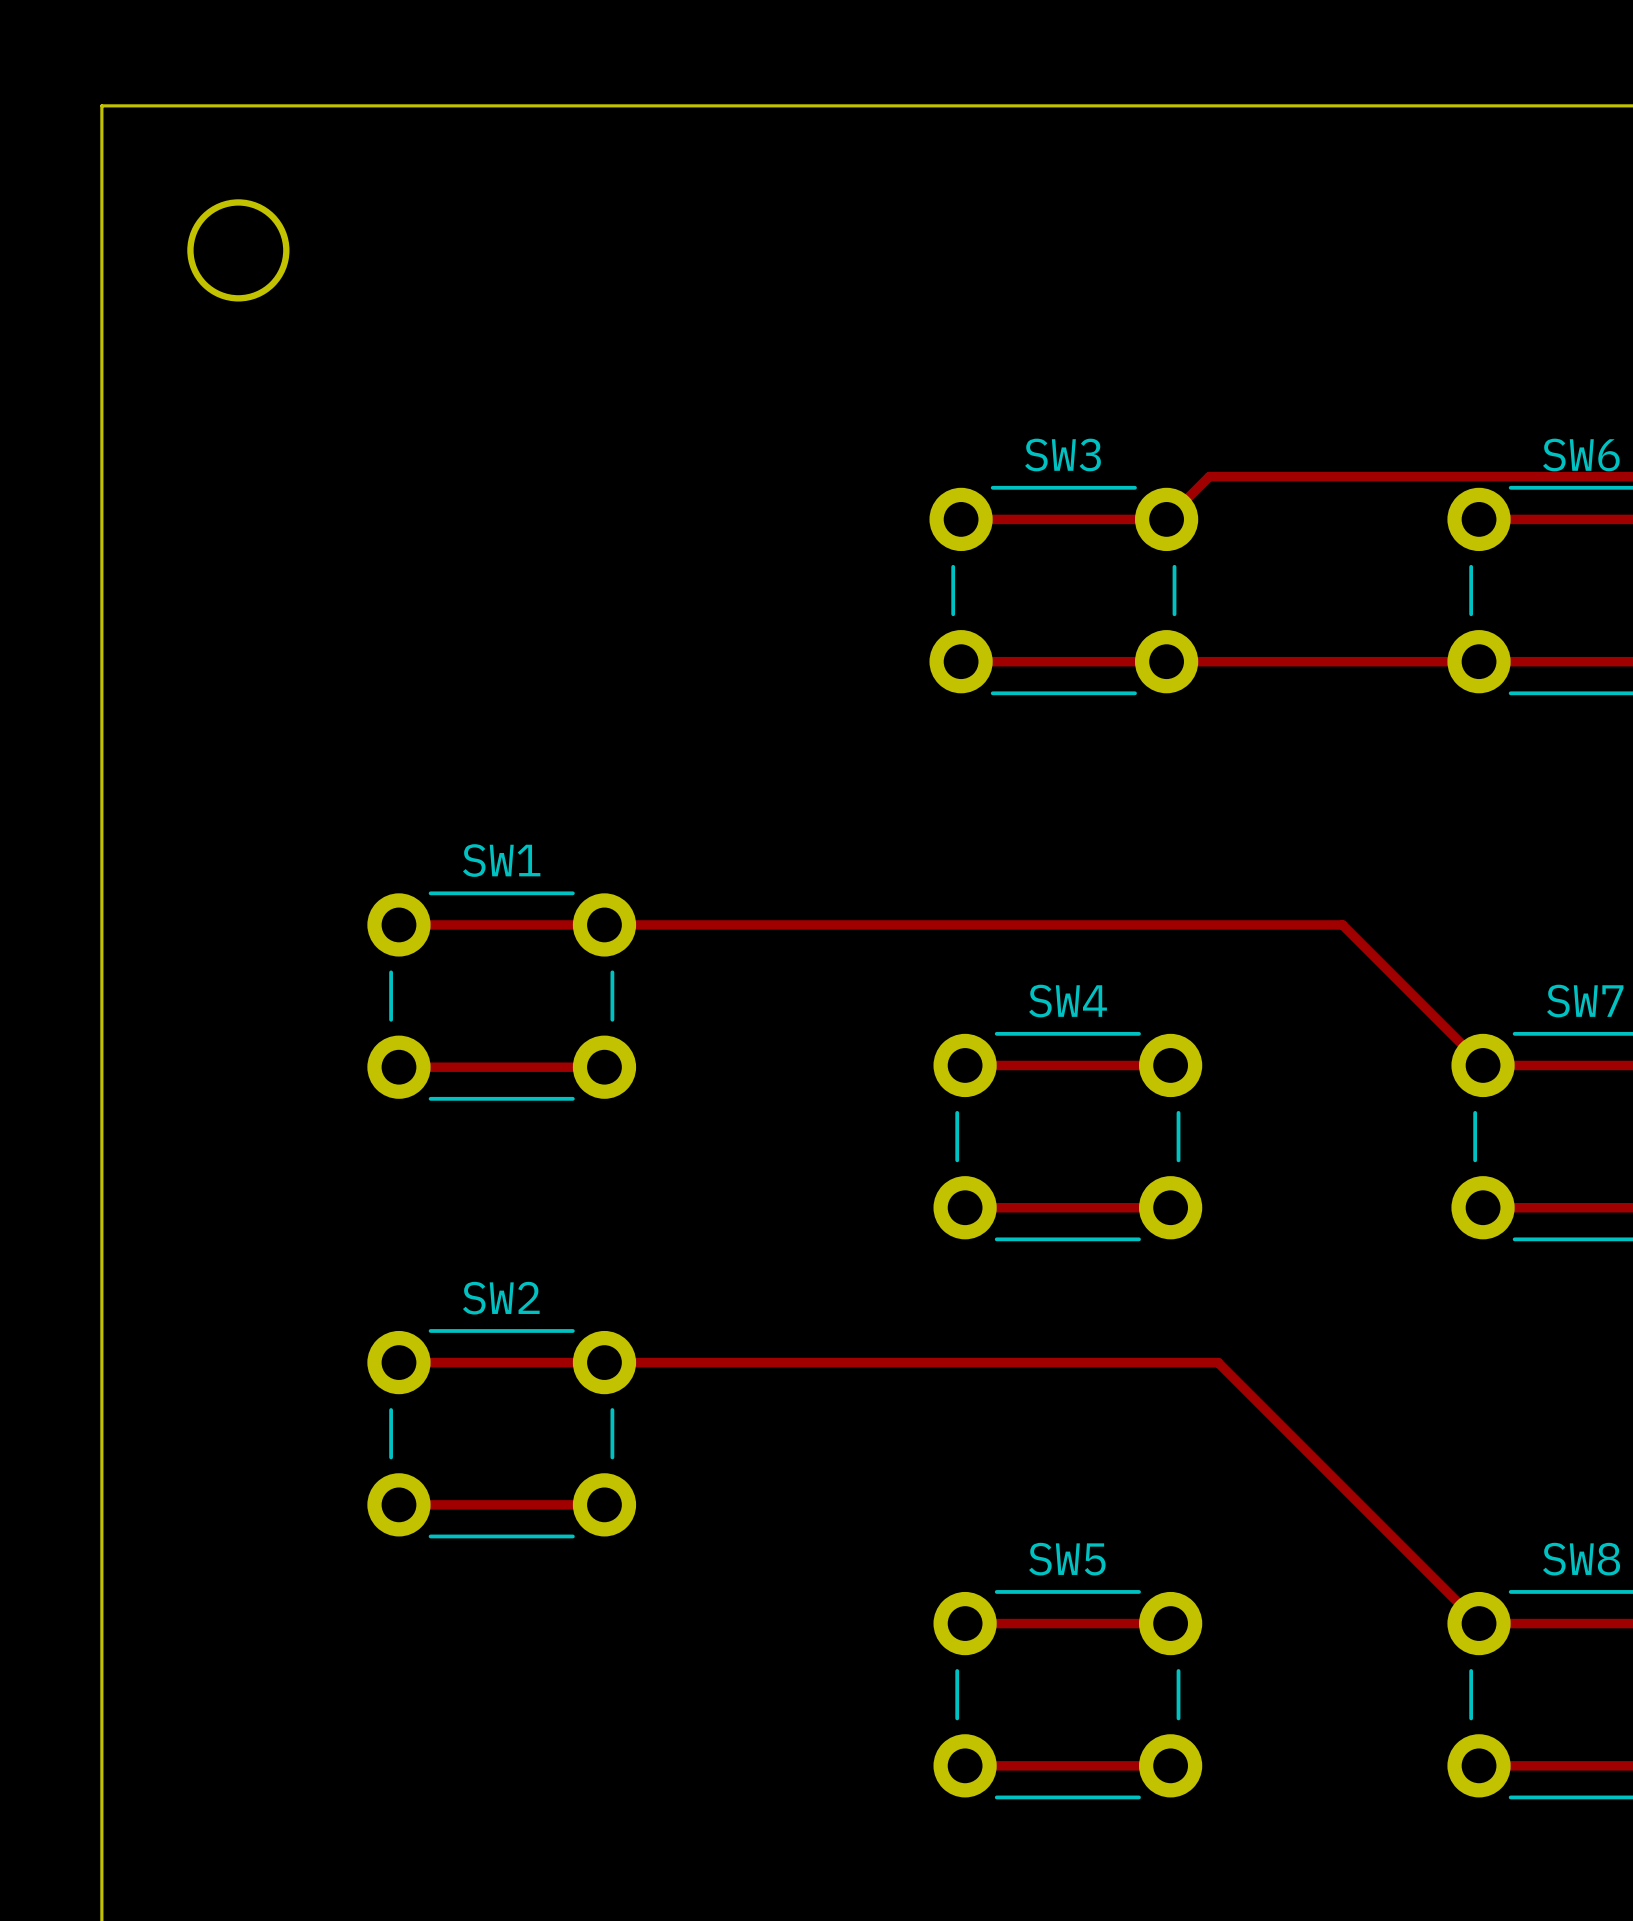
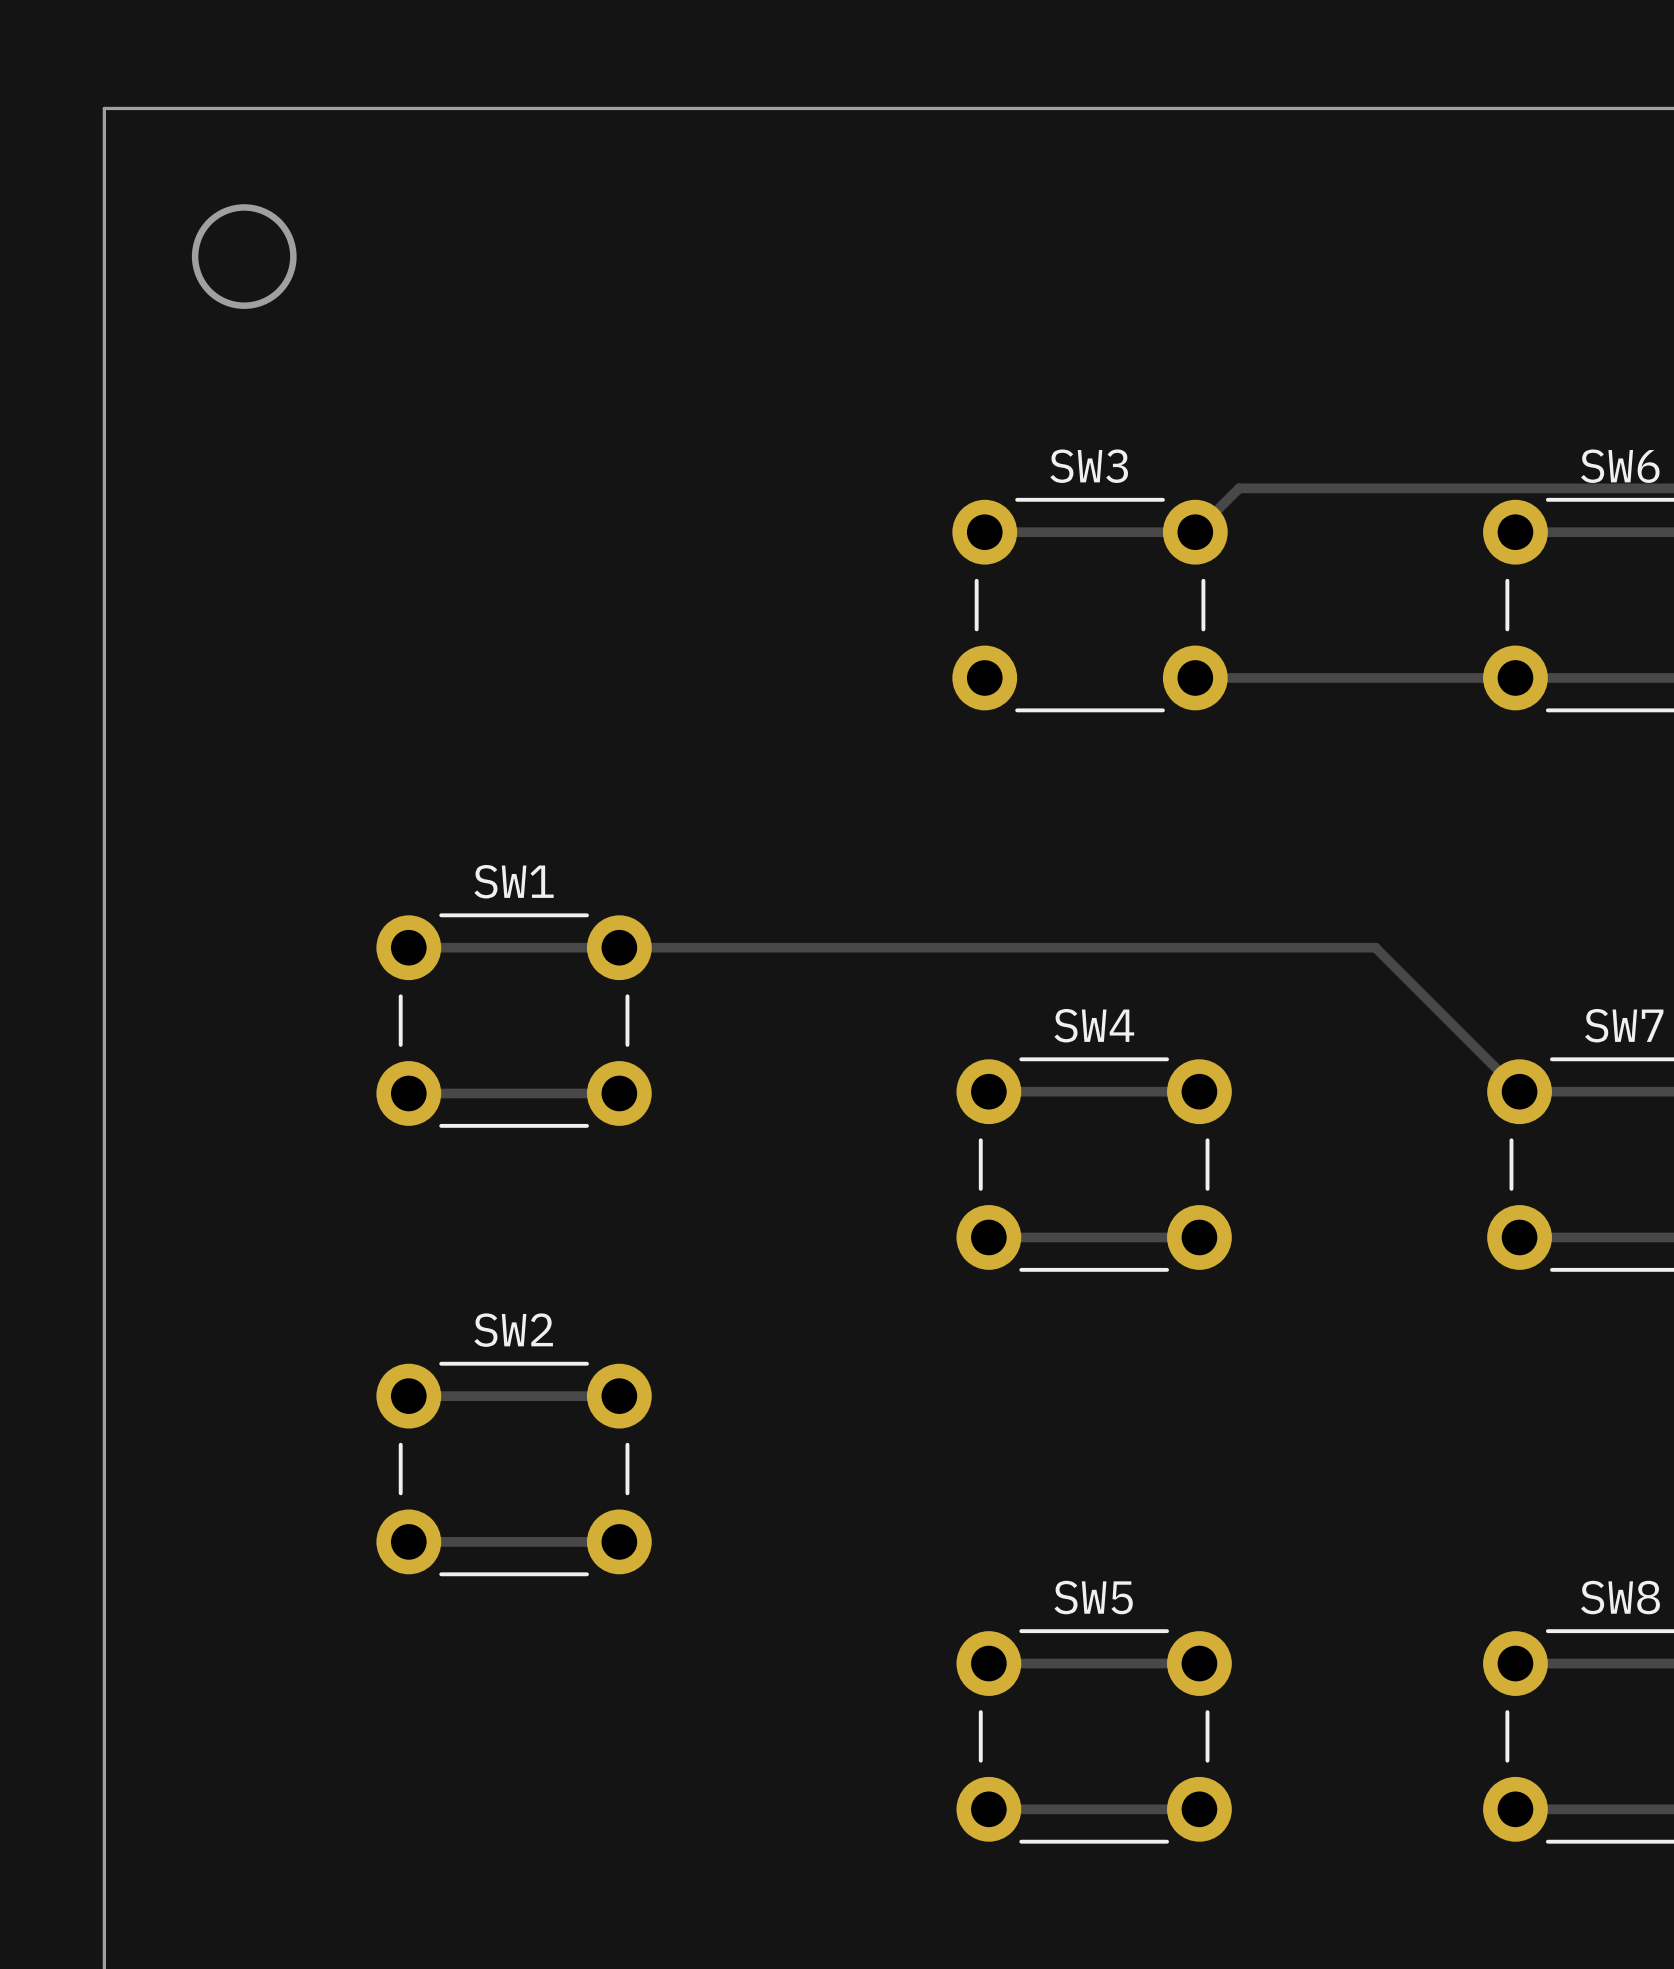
track: (961, 661) (1166, 661) -> none
track: (604, 1362) (1218, 1362) (1479, 1623) -> none

